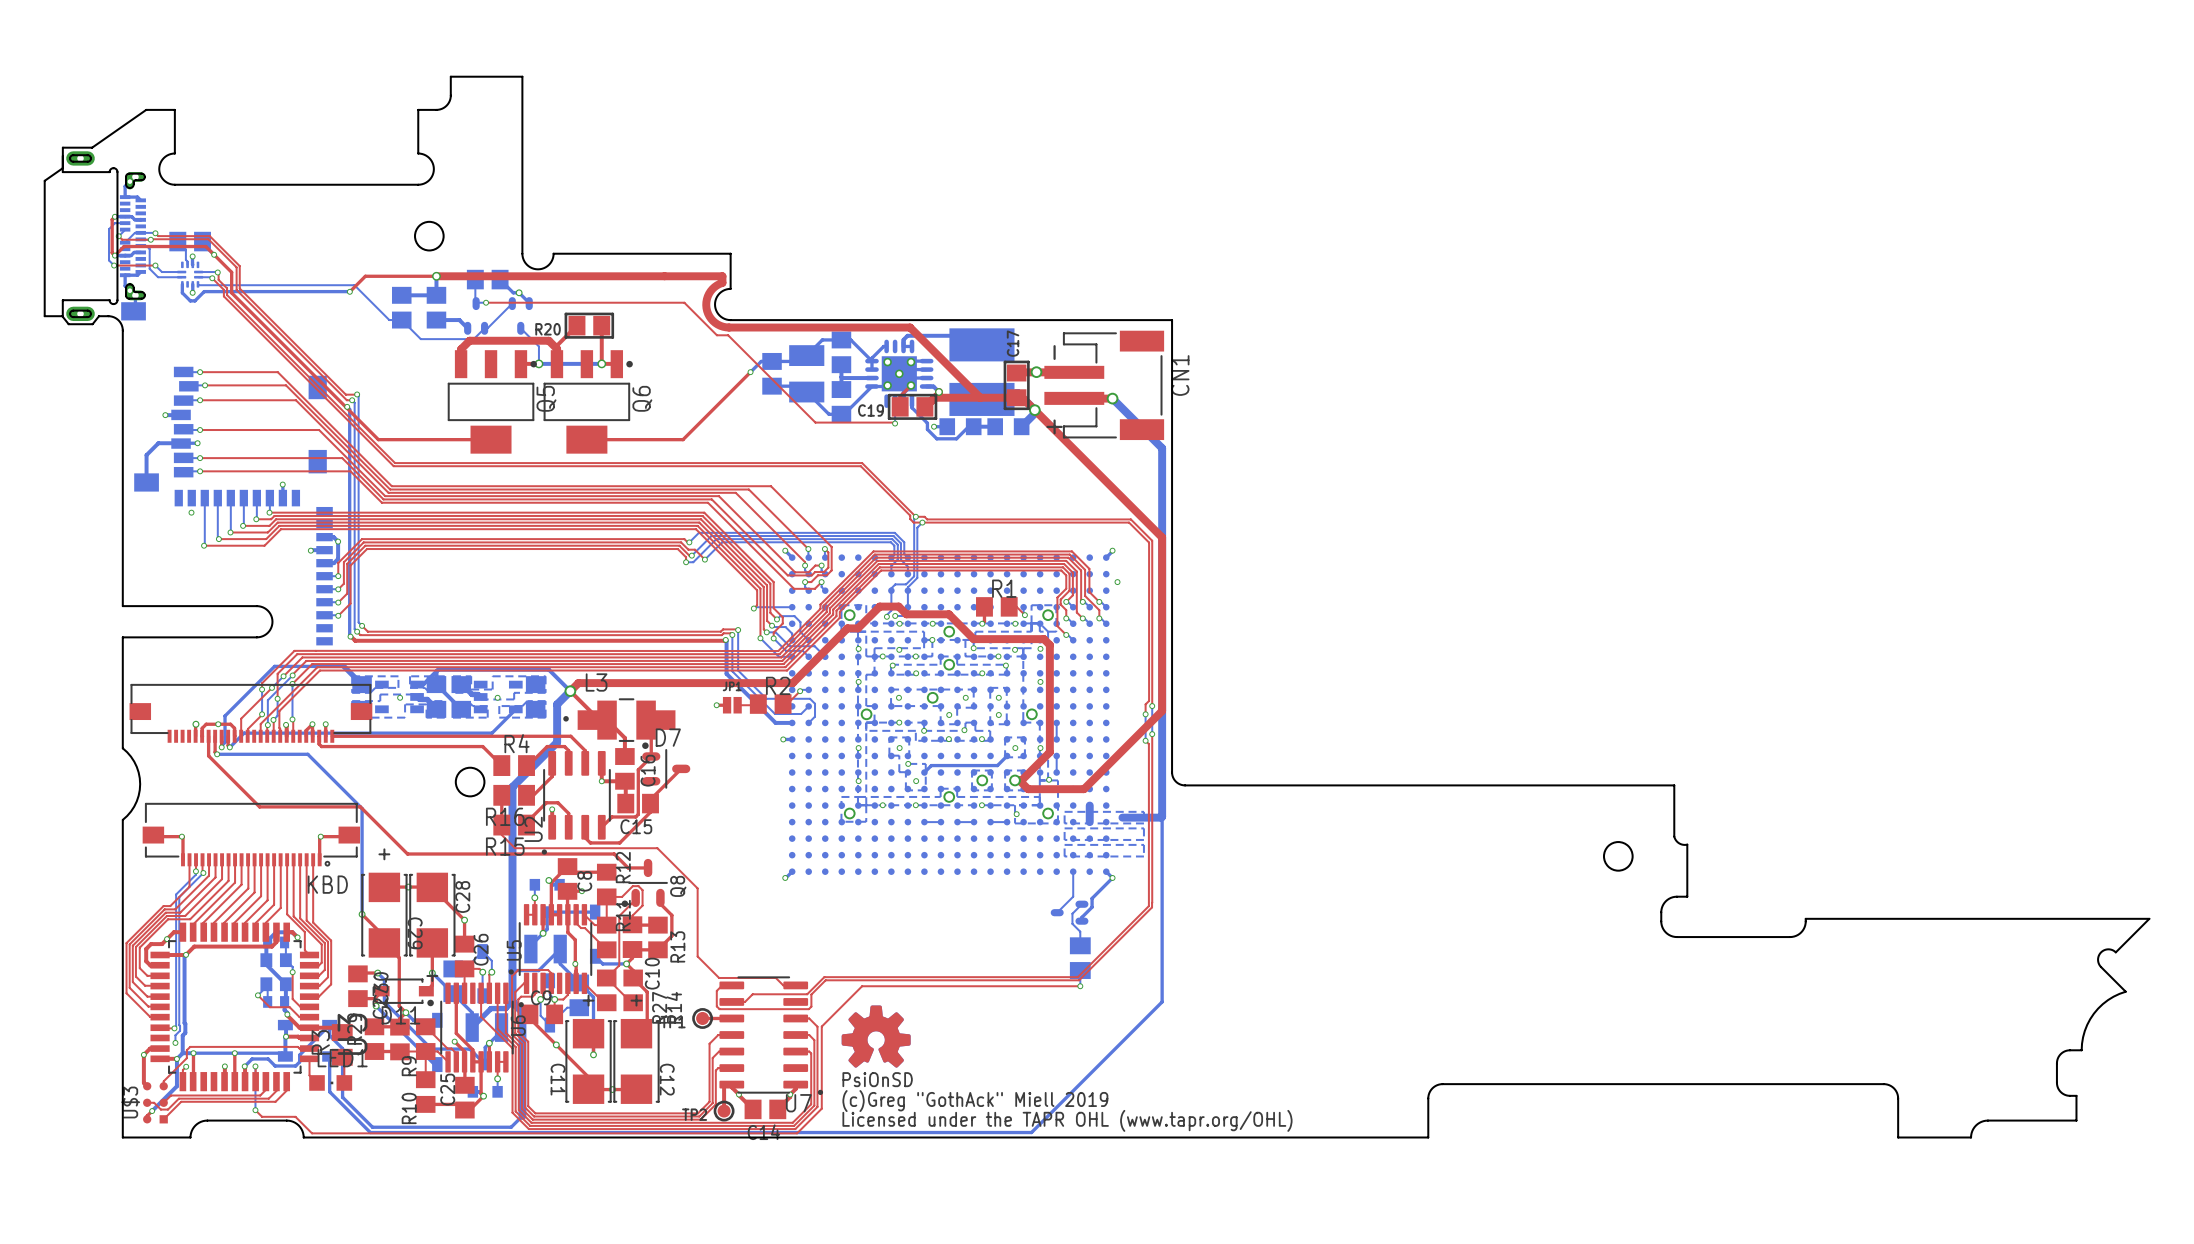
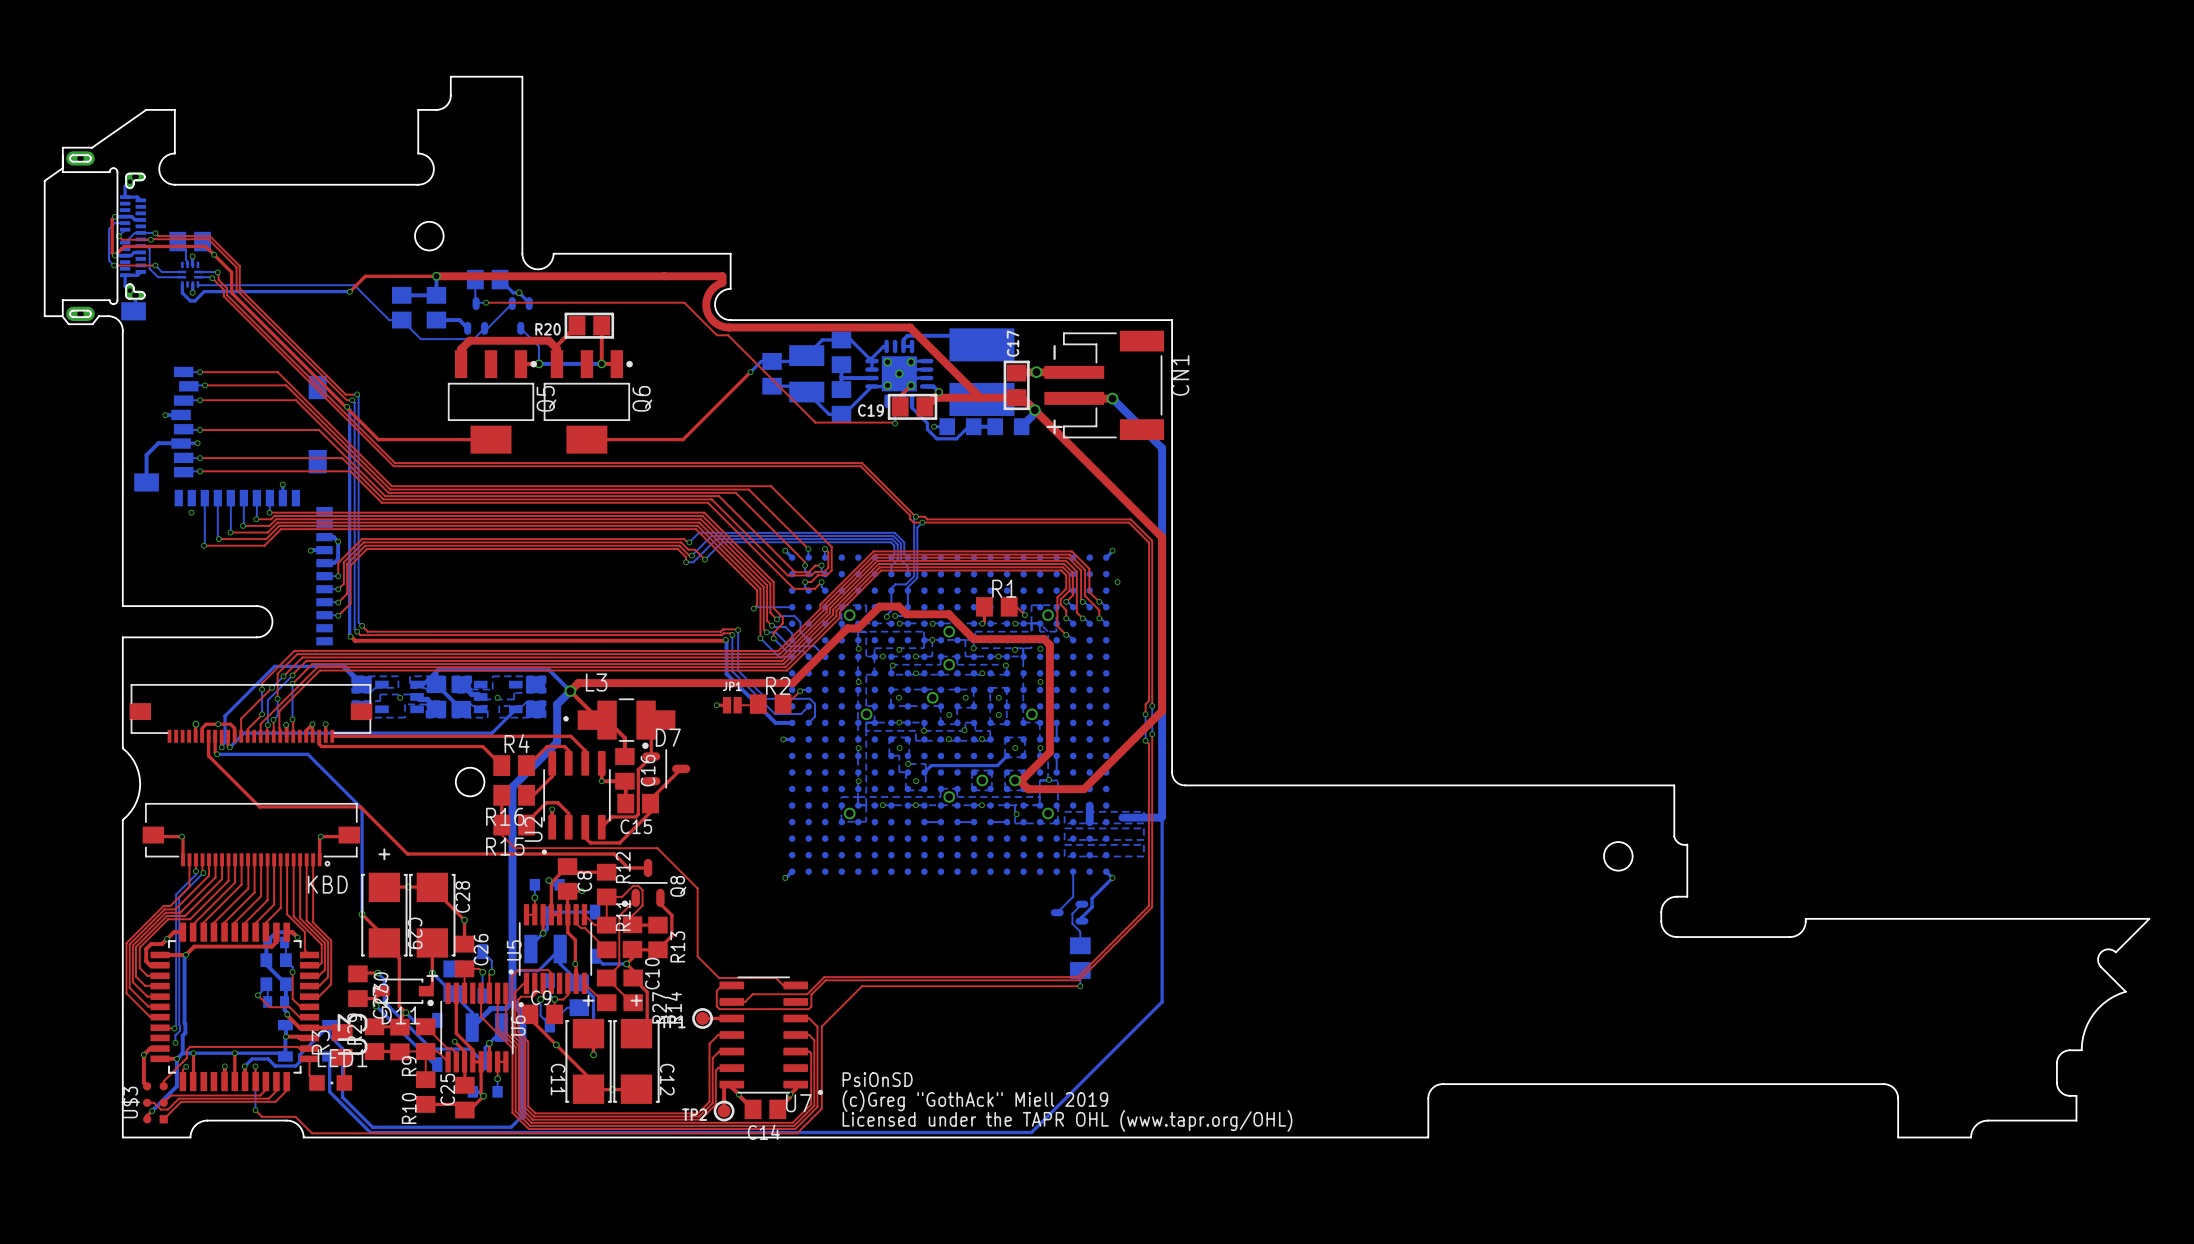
drawing: [841, 1005, 911, 1068] -> none

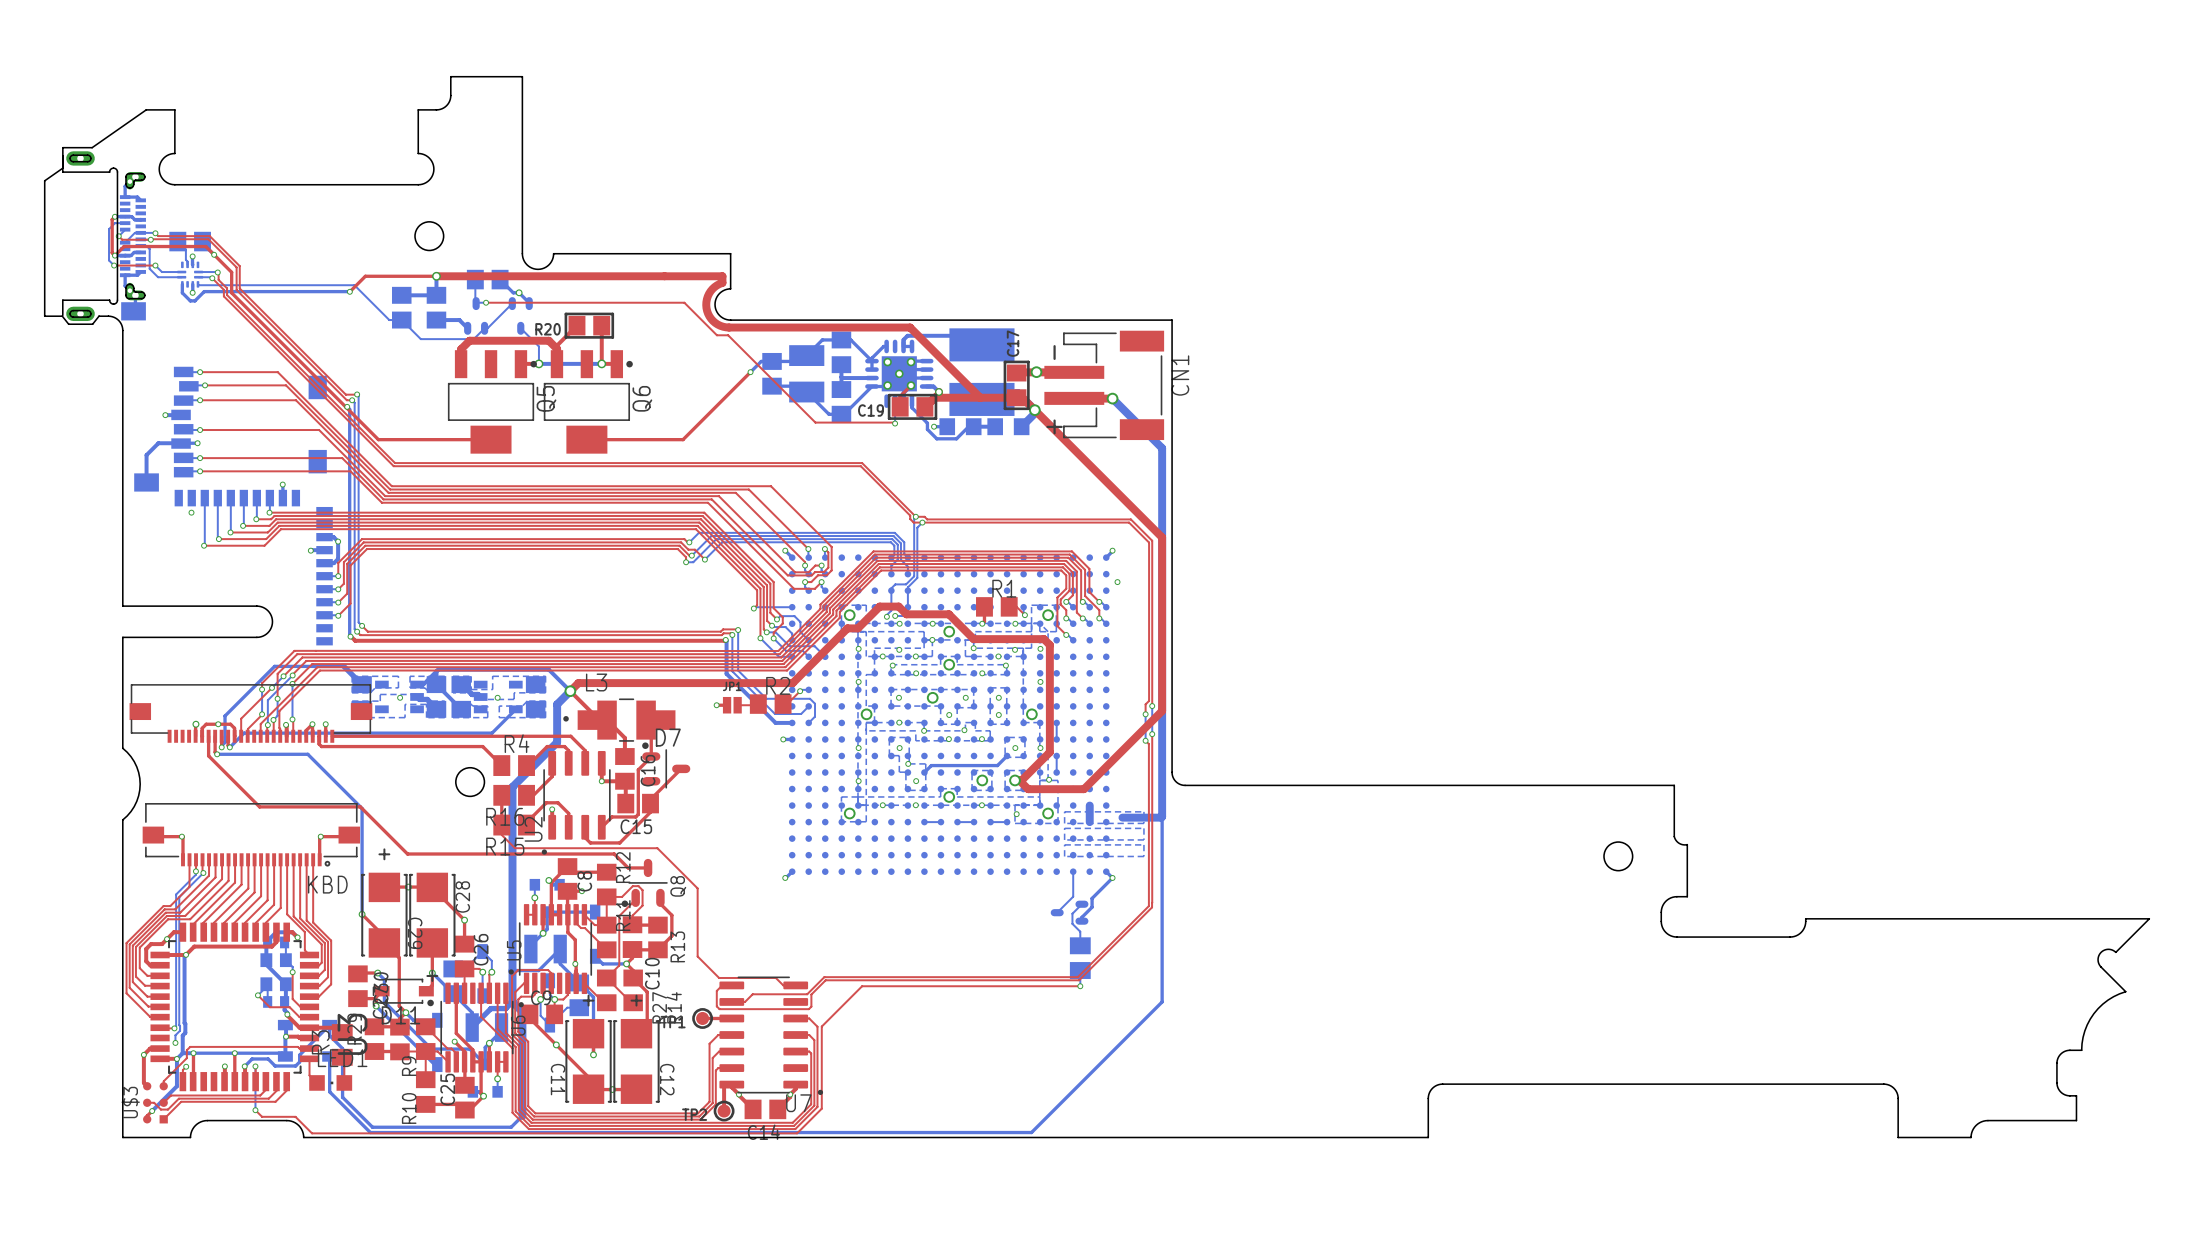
text: PsiOnSD (877, 1079) -> none
text: (c)Greg "GothAck" Miell 2019 (975, 1101) -> none
text: Licensed under the TAPR OHL (www.tapr.org/OHL) (1067, 1120) -> none

